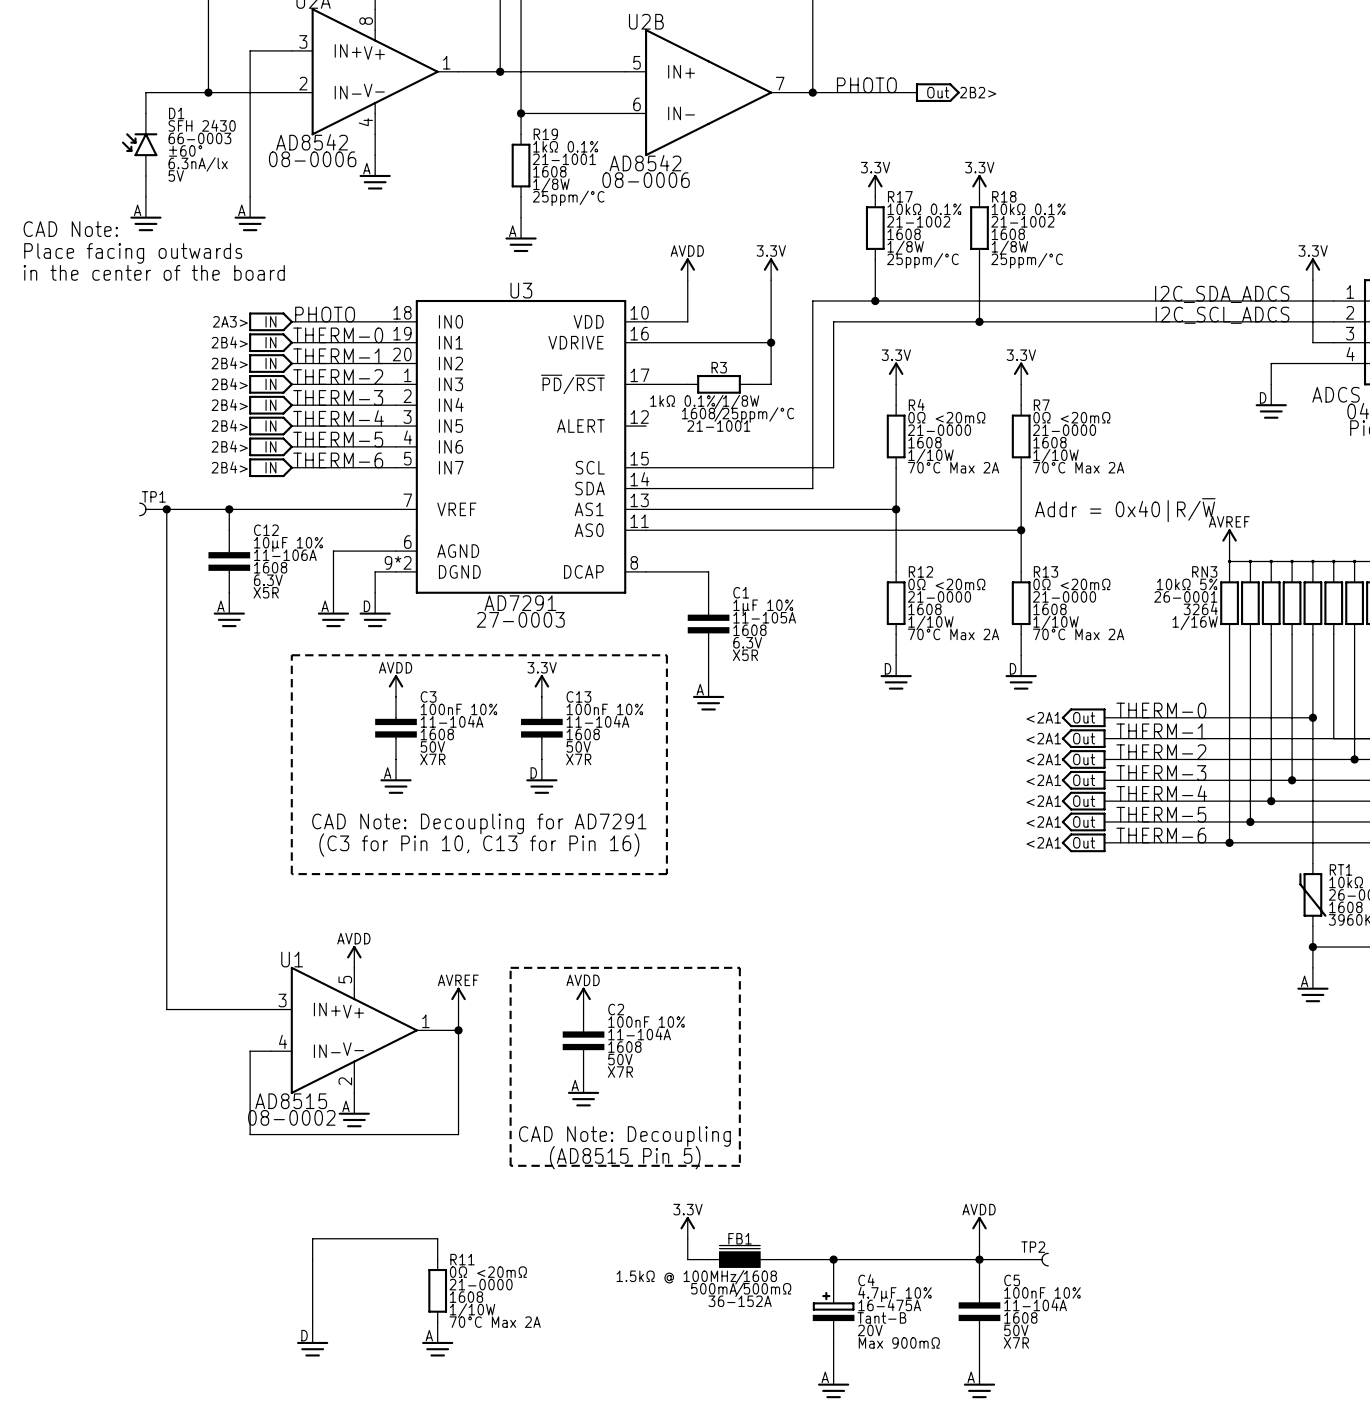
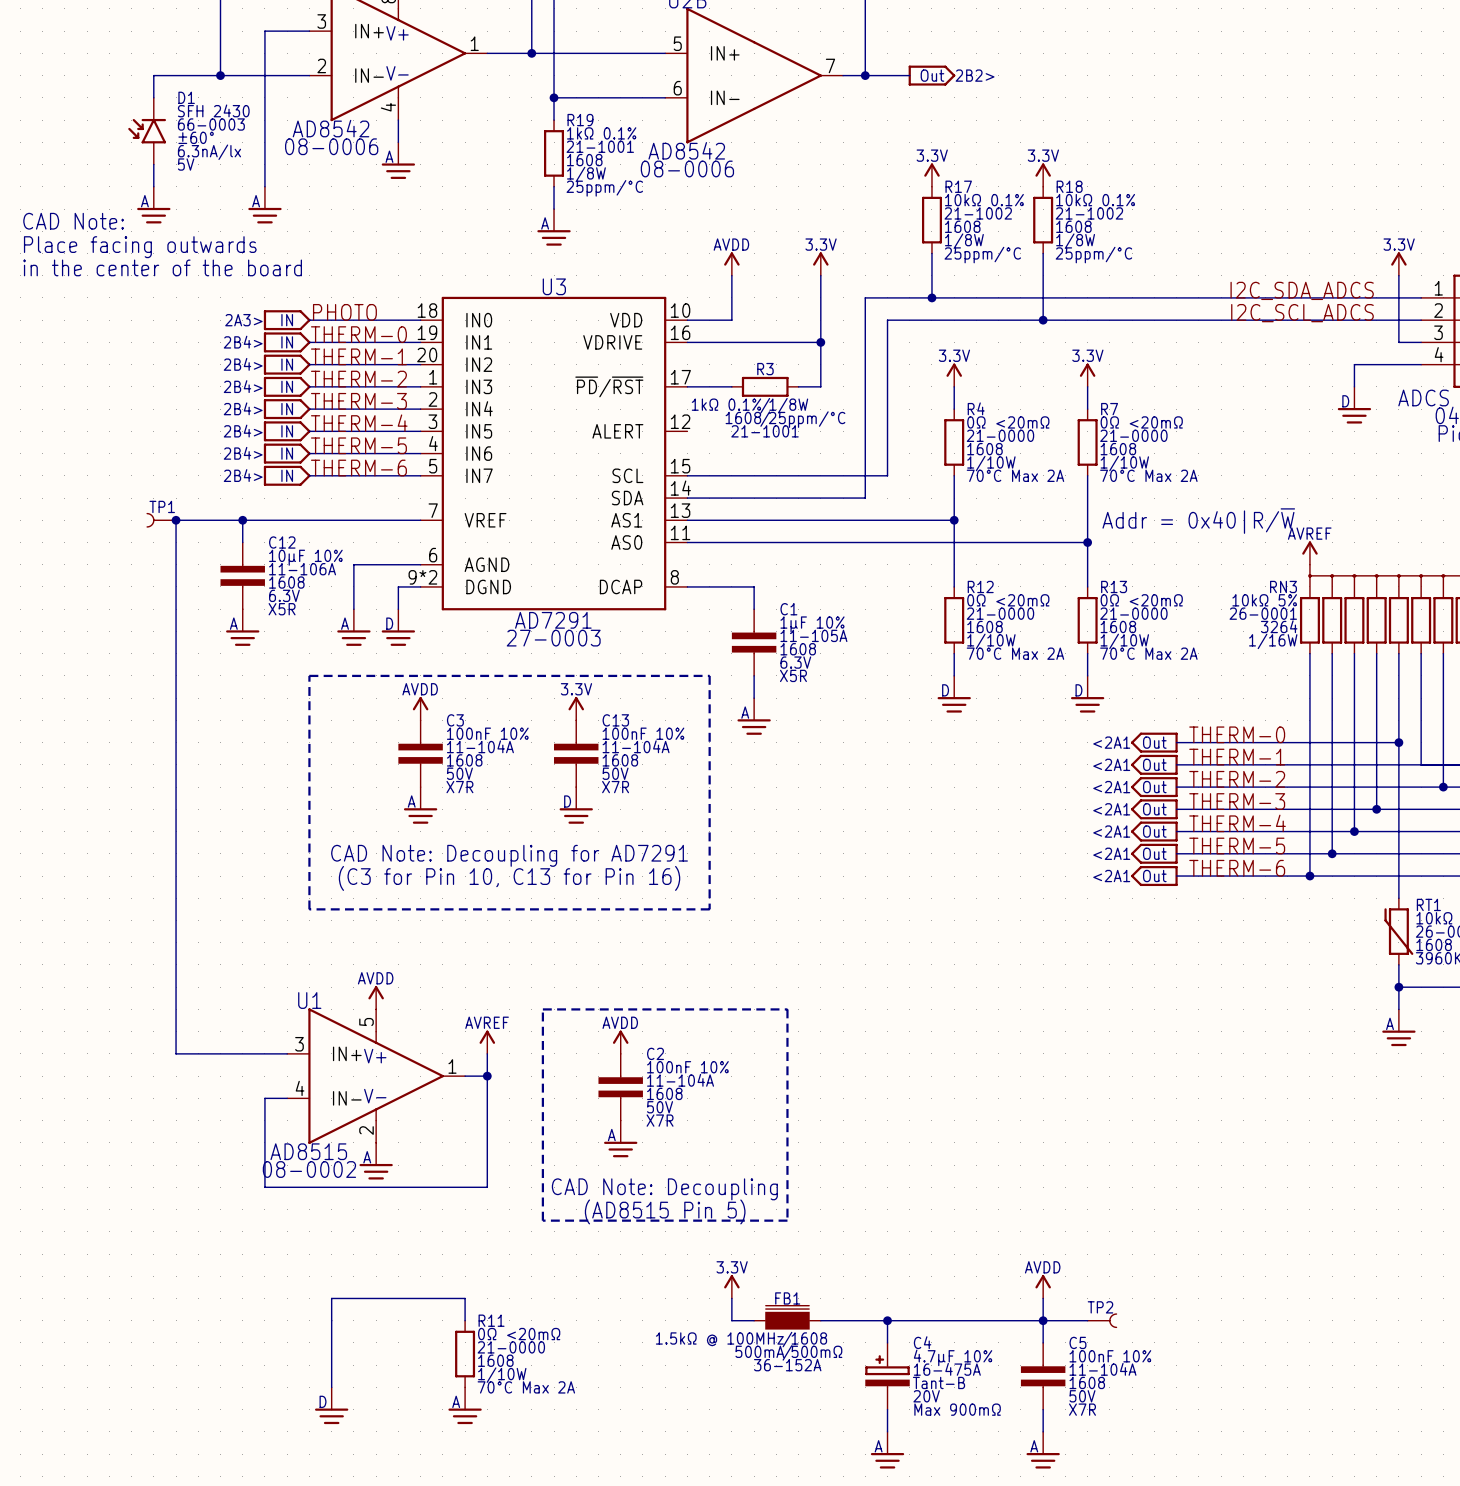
label: PHOTO (866, 85) -> none
wire: (854, 92) (916, 92) -> none
part position: (937, 92) -> (931, 75)
text position: 2B2> (978, 92) -> 2B2> (975, 75)

